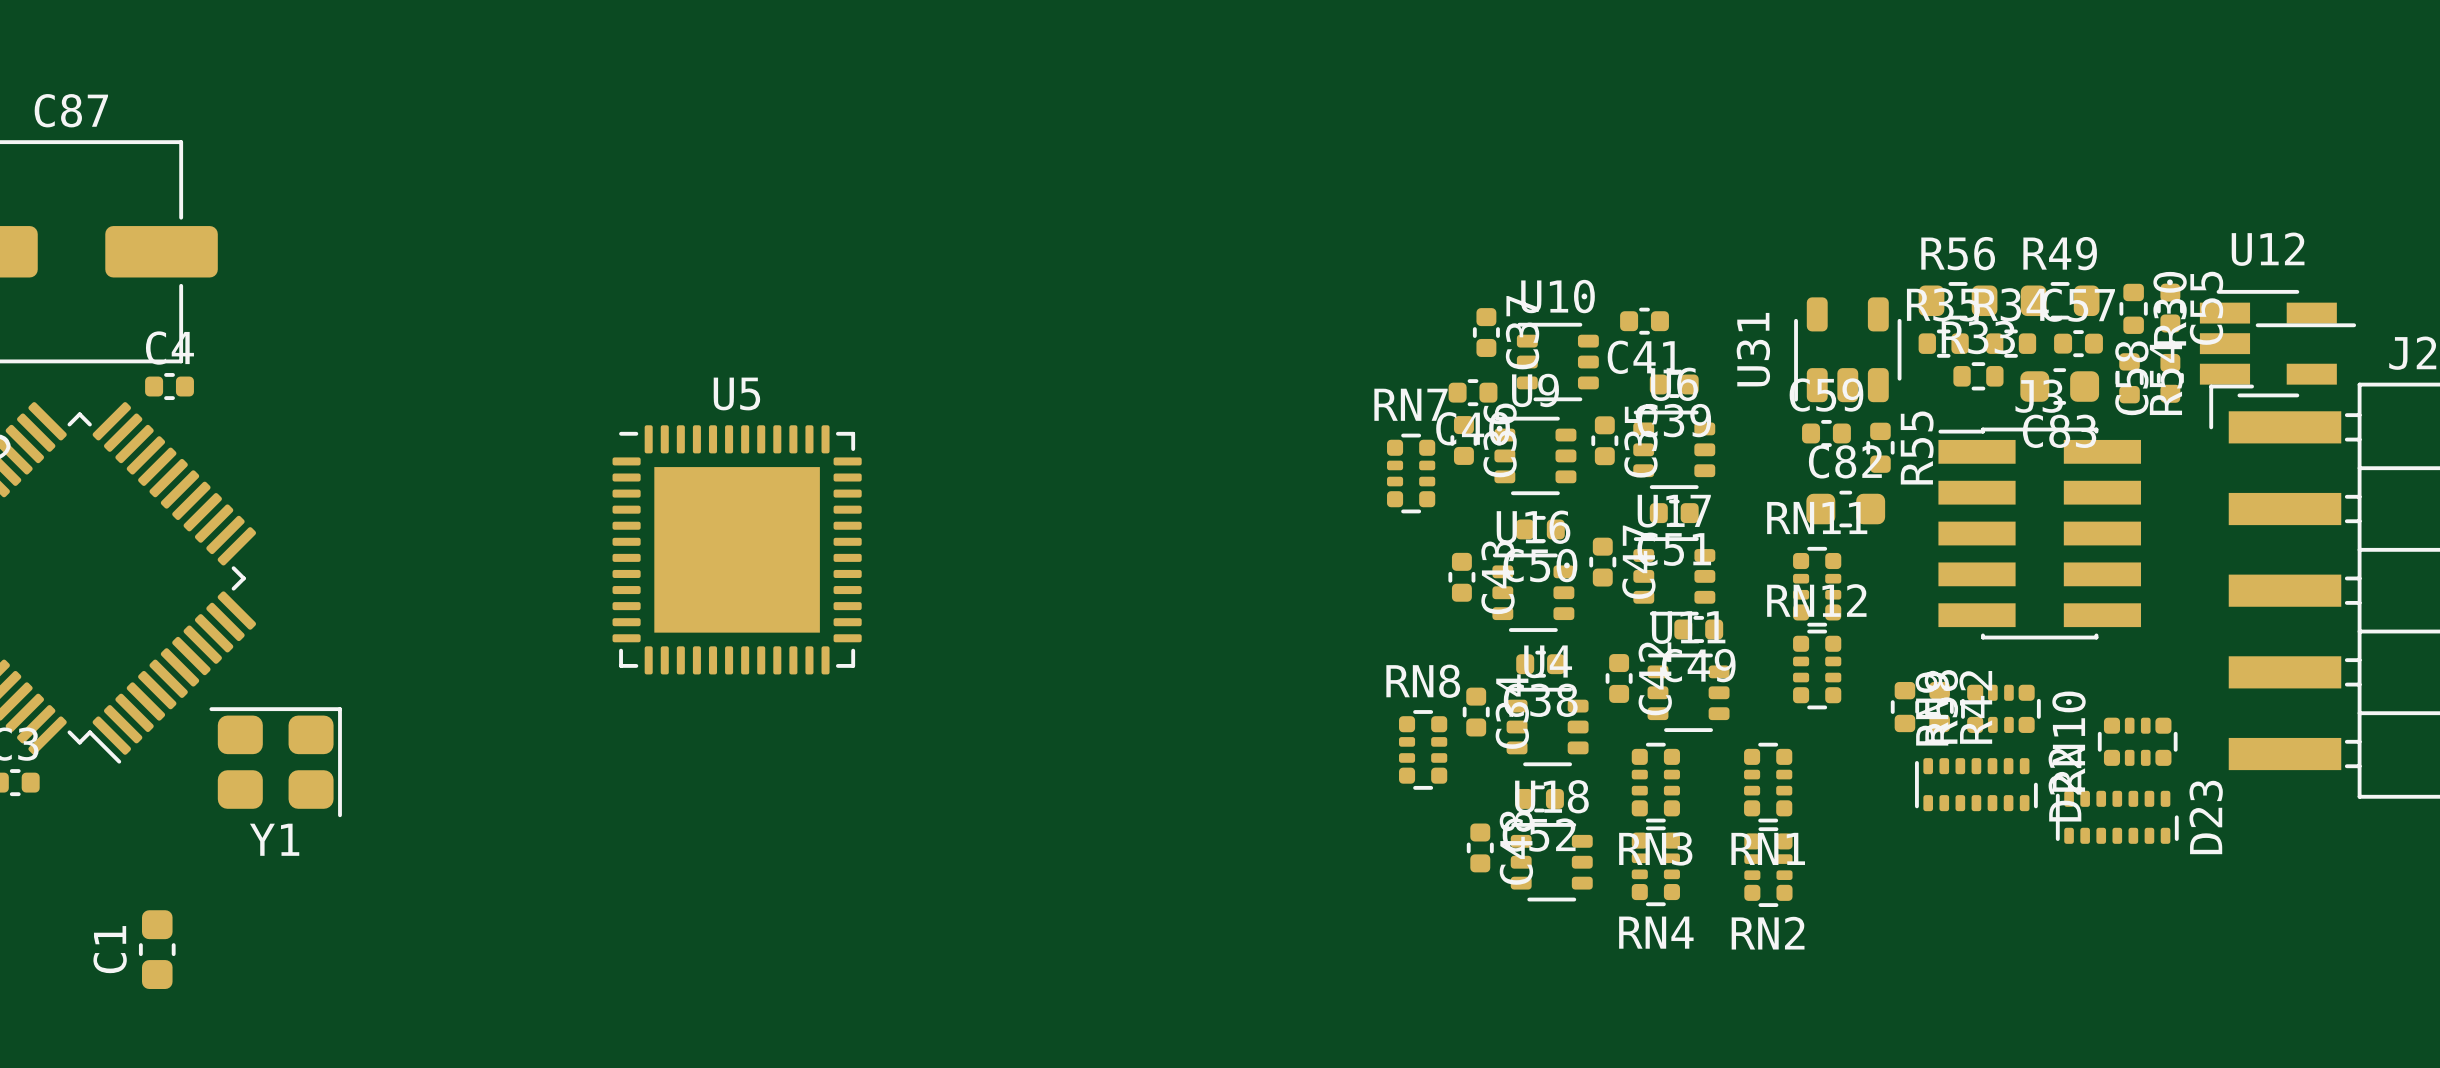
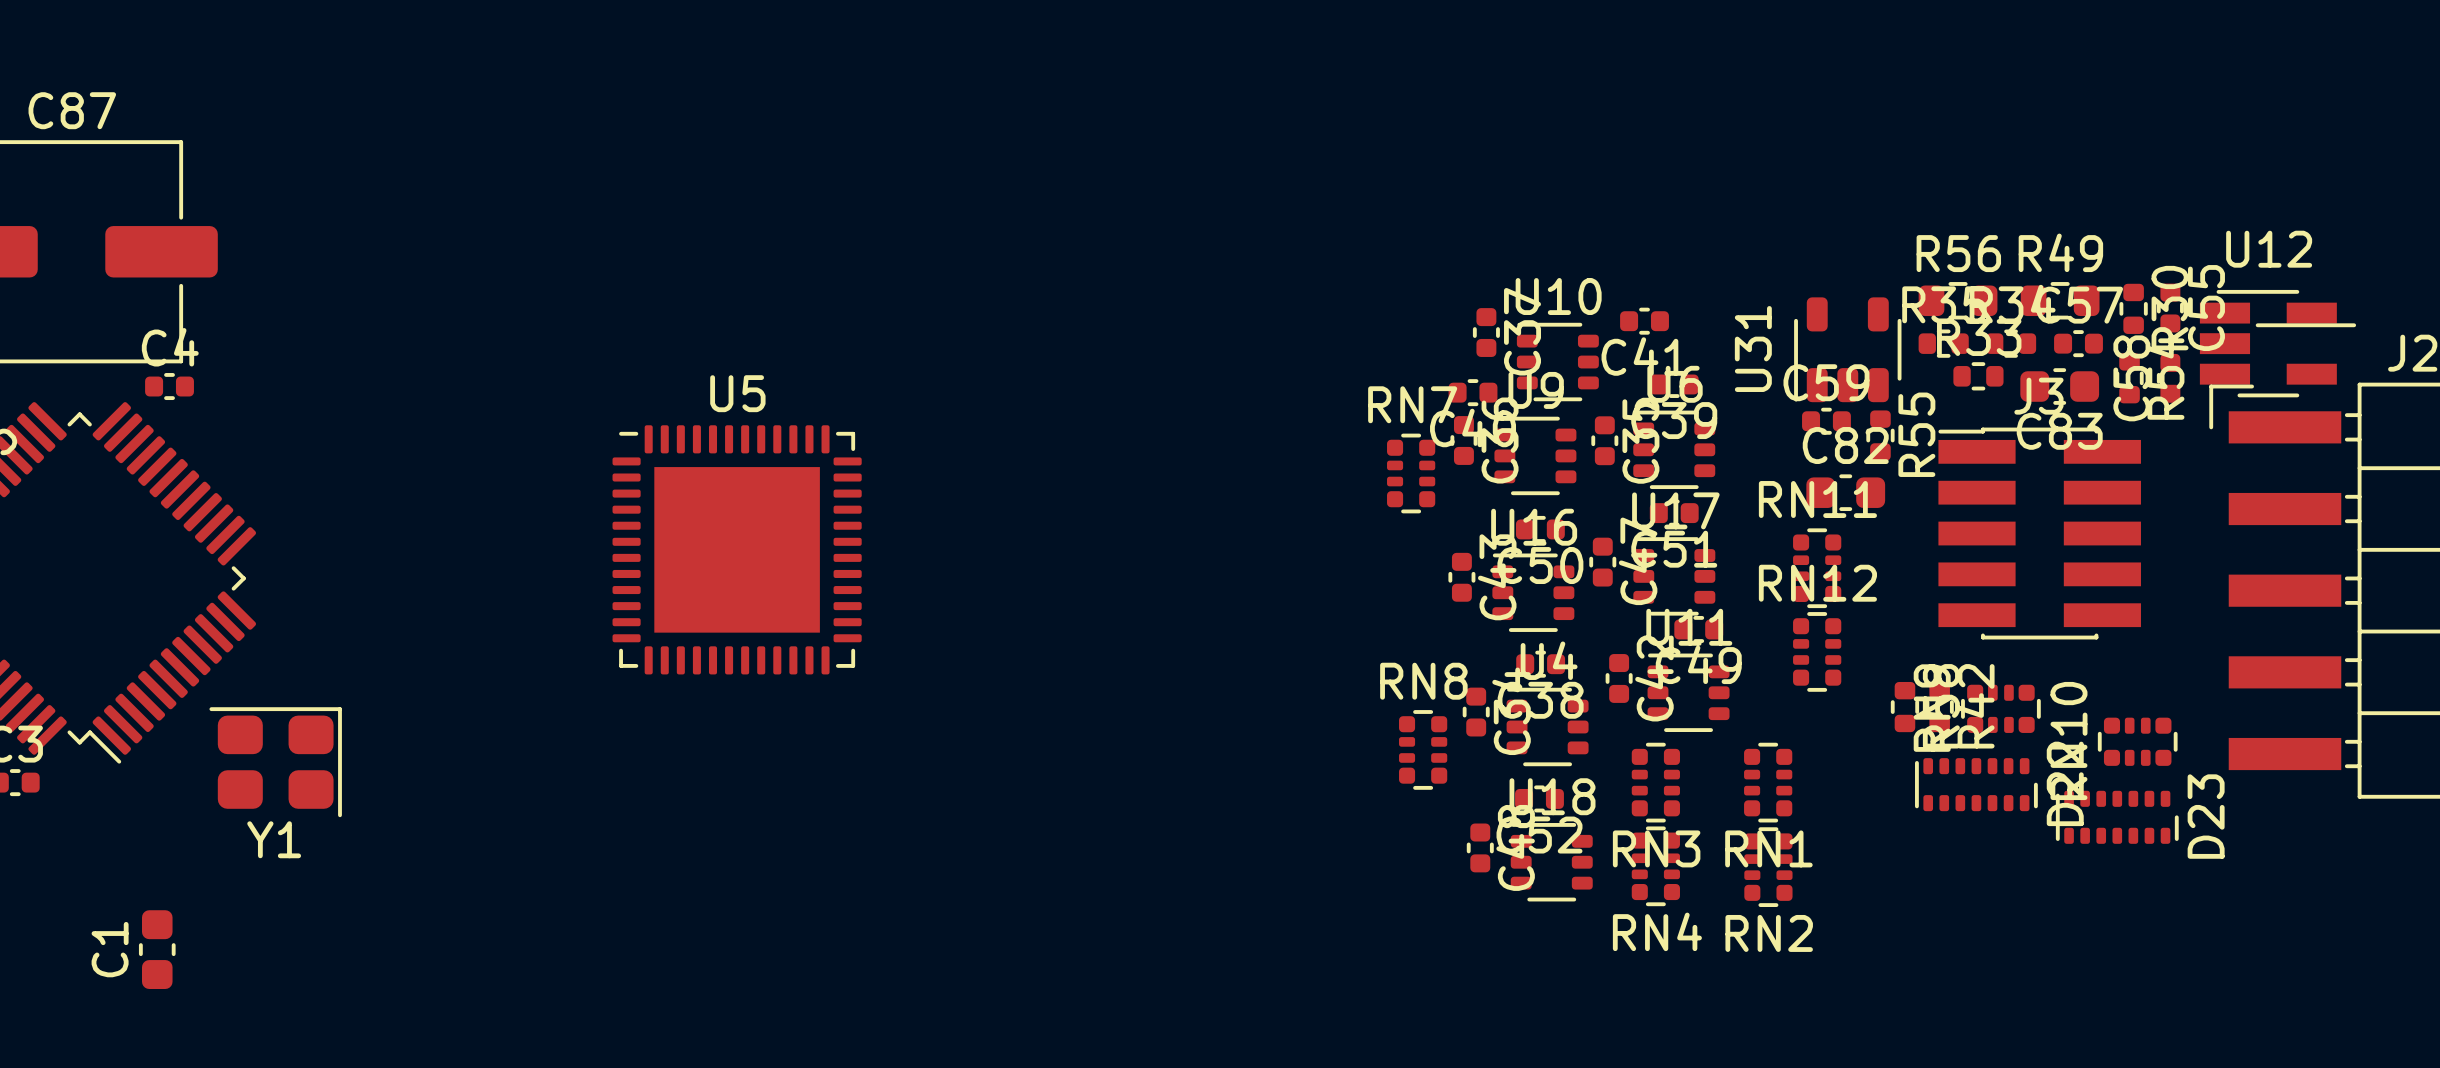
C59 position: (1826, 433) -> (1826, 421)
R55 position: (1880, 447) -> (1880, 435)
C82 position: (1845, 509) -> (1845, 492)
RN11 position: (1817, 586) -> (1817, 568)
RN12 position: (1817, 669) -> (1817, 651)

